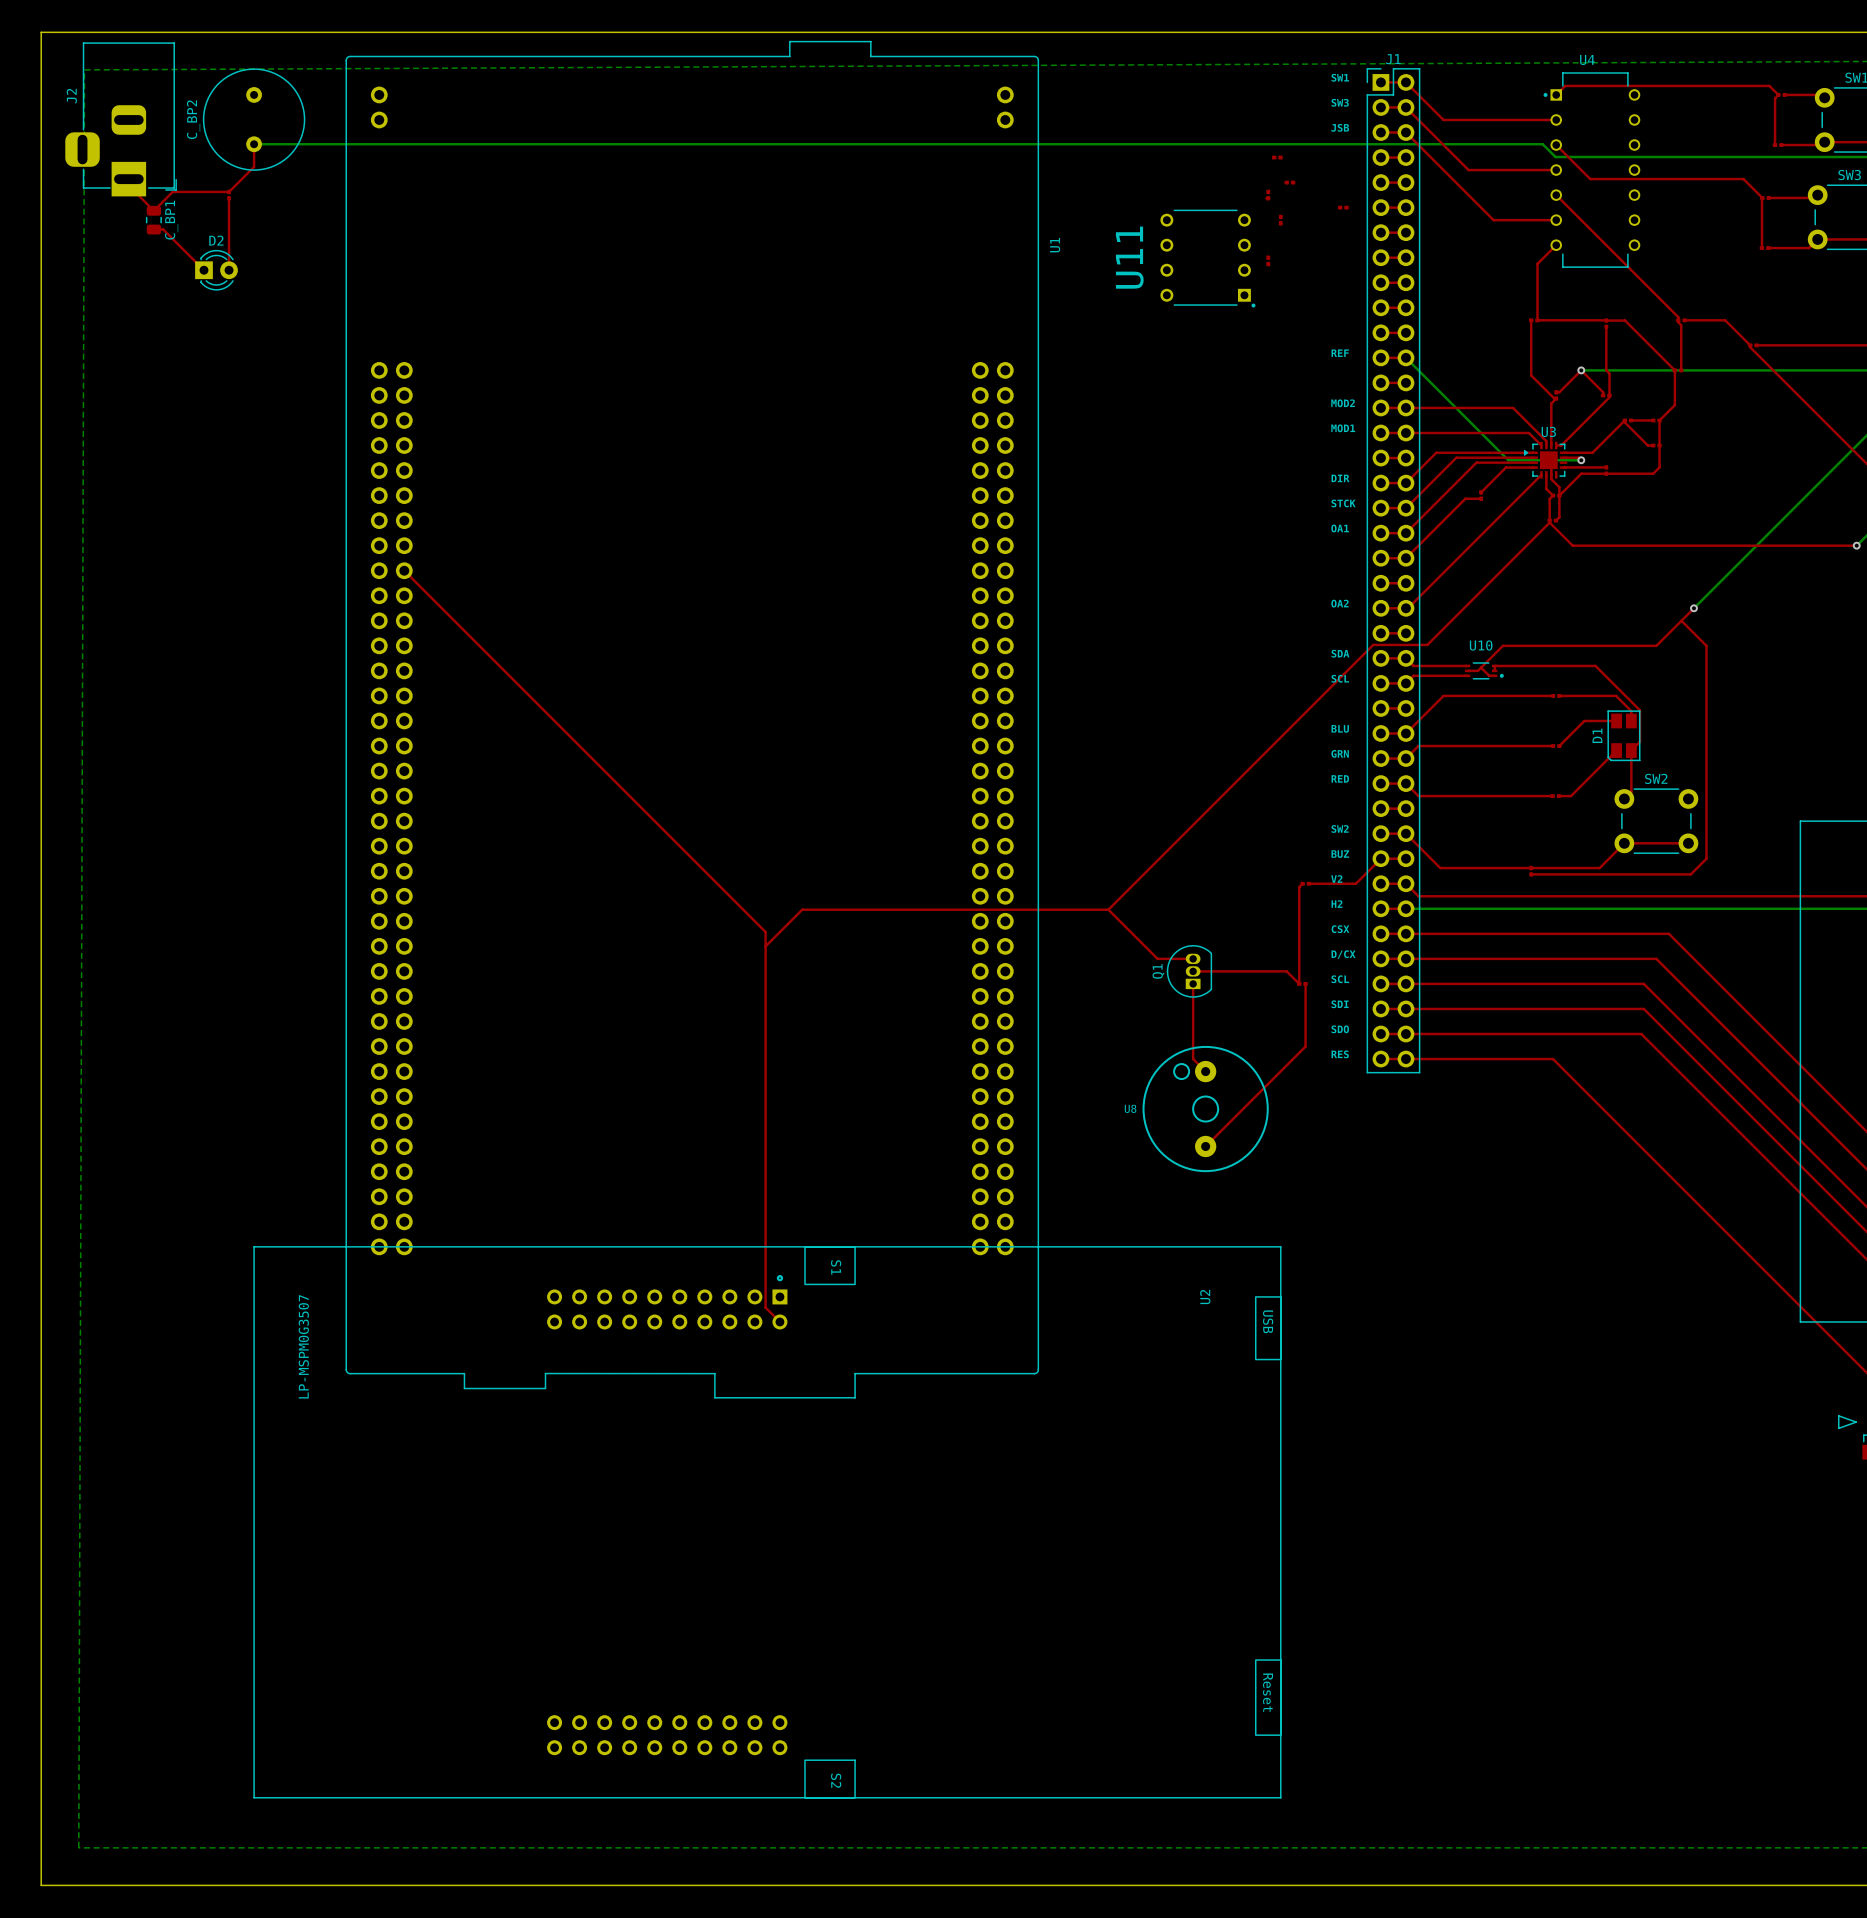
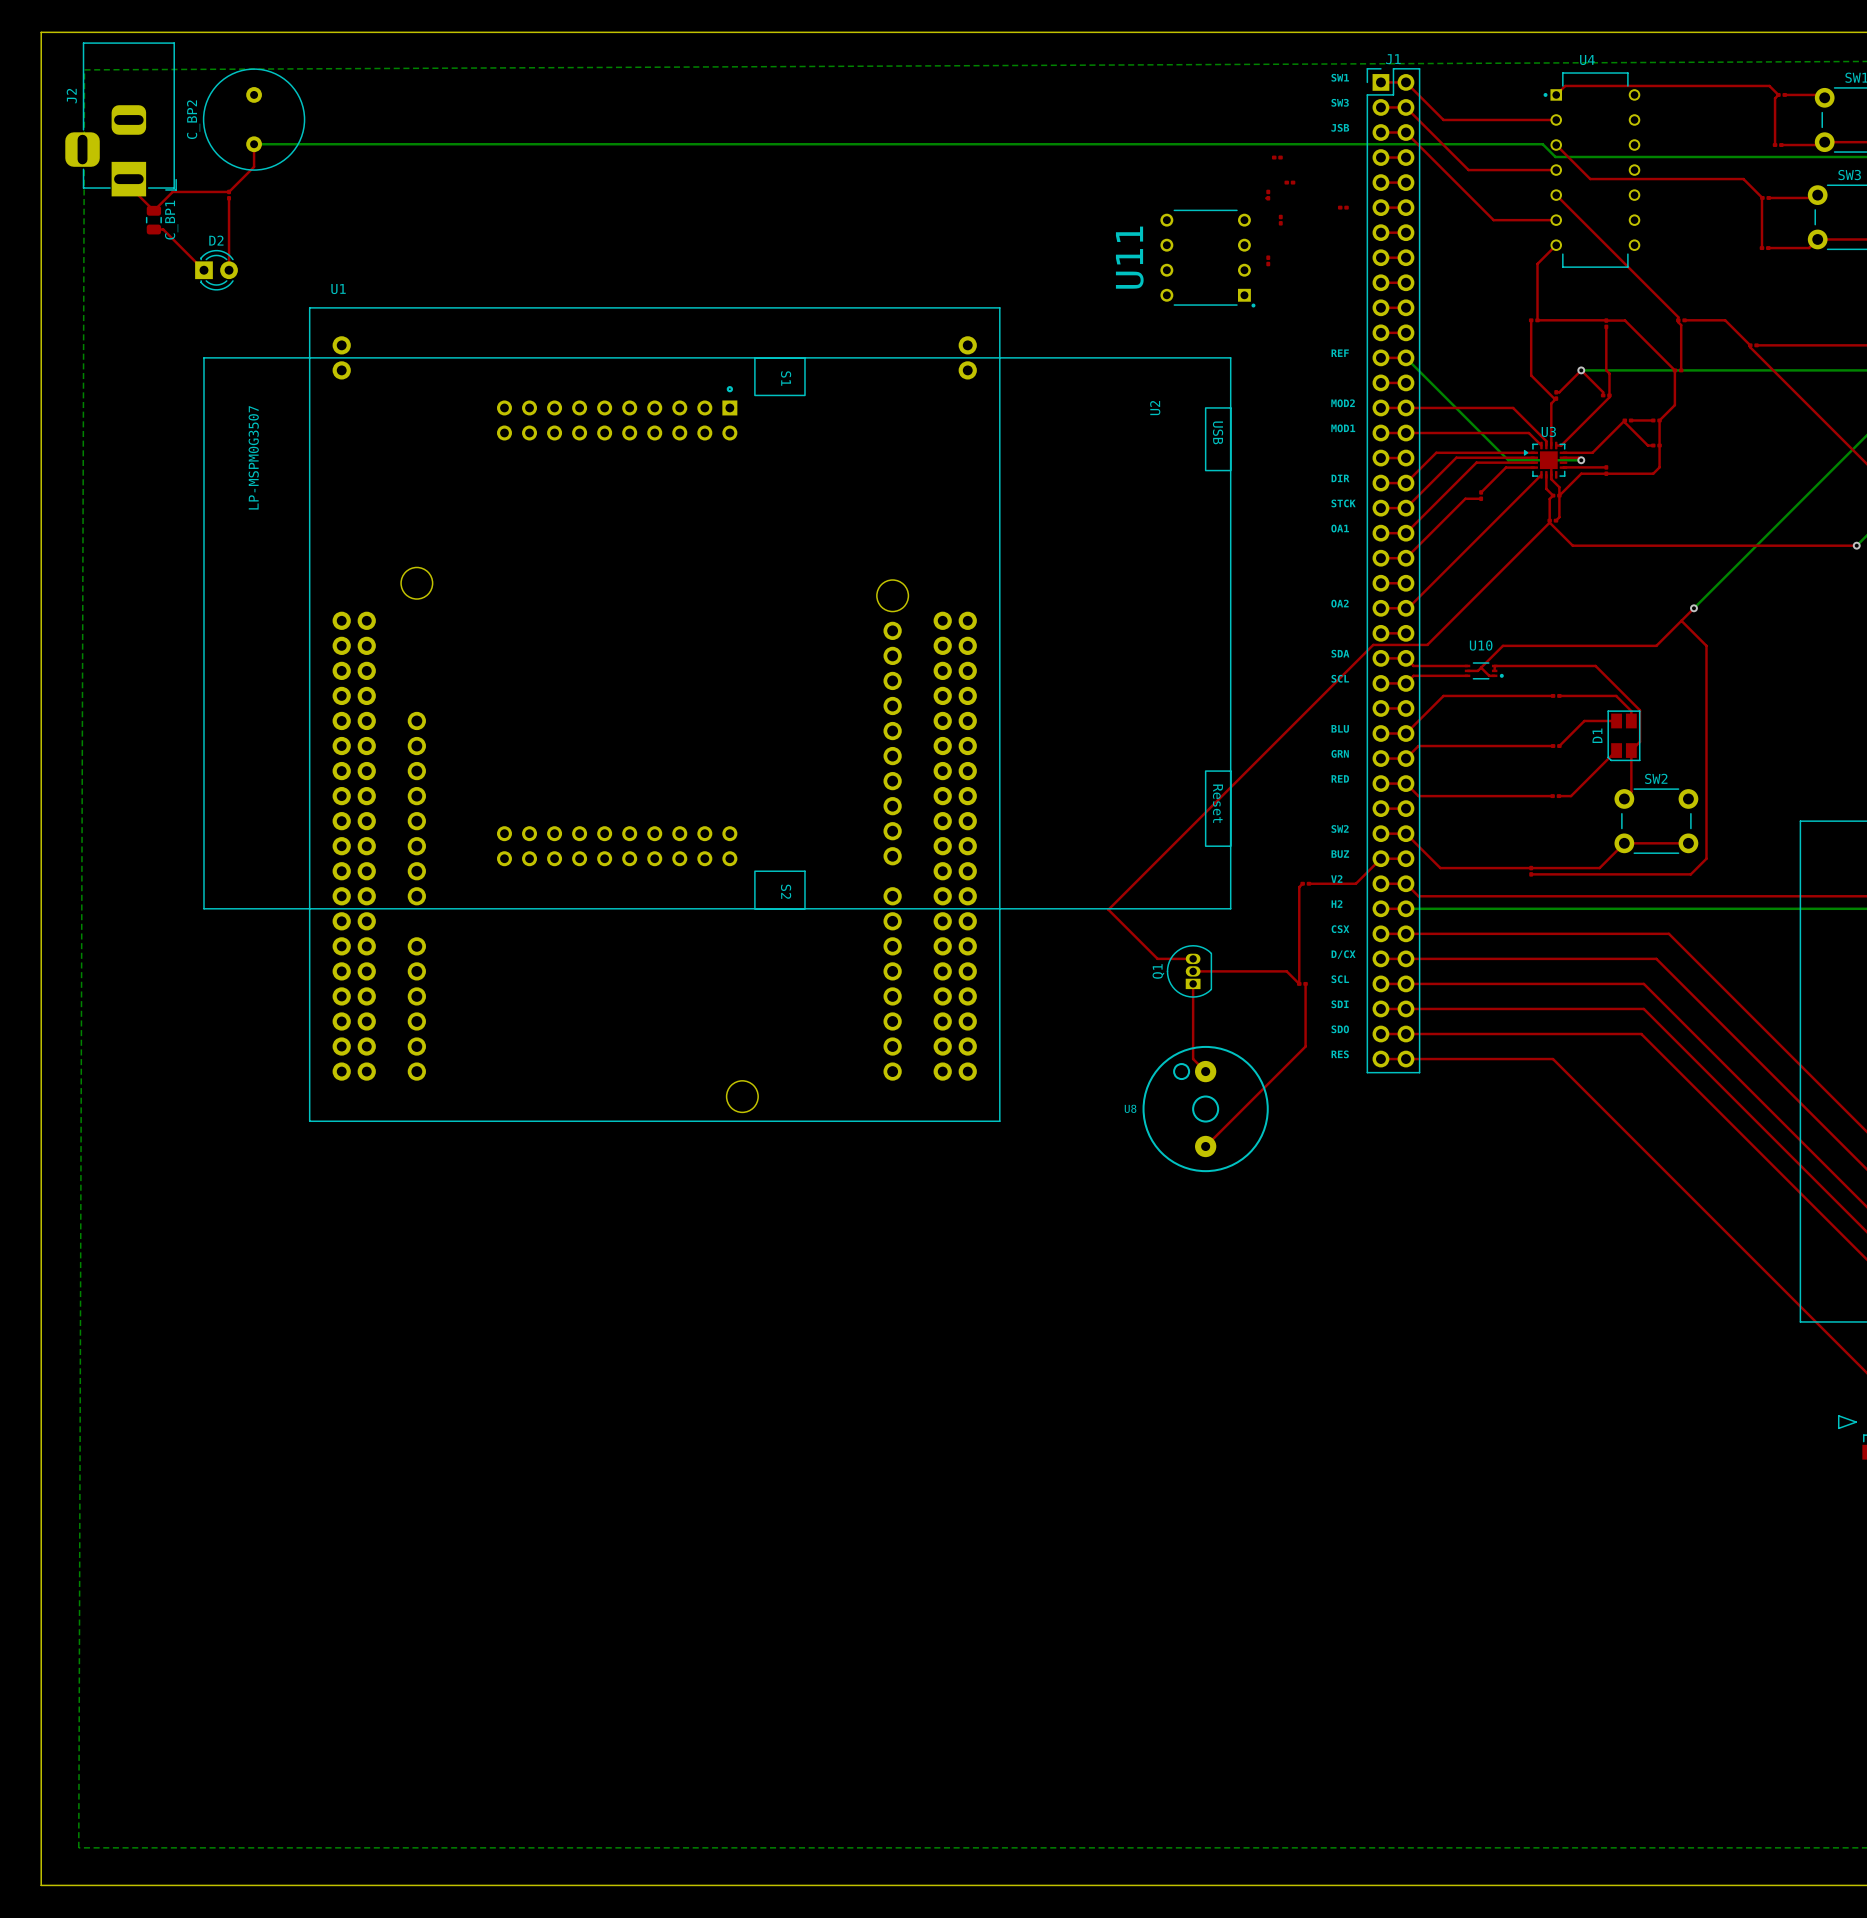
U1 footprint: [345, 41, 1039, 1399] -> [309, 307, 1001, 1122]
U1 name position: U1 (1055, 245) -> U1 (338, 289)
top track: (404, 570) (765, 932) (765, 1307) (779, 1321) -> none
top track: (1108, 909) (802, 909) (765, 946) -> none
U2 position: (767, 1522) -> (717, 633)

